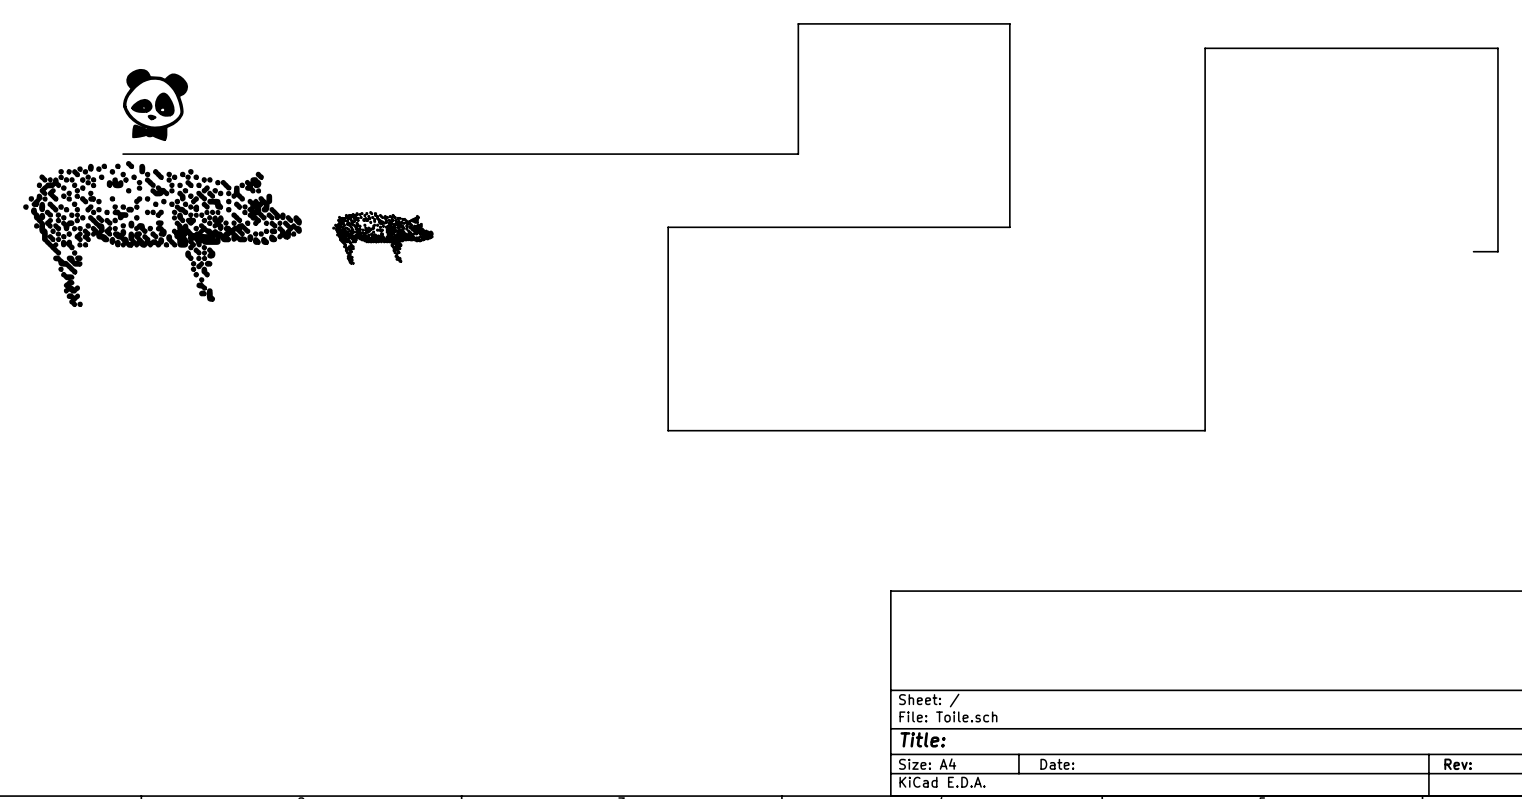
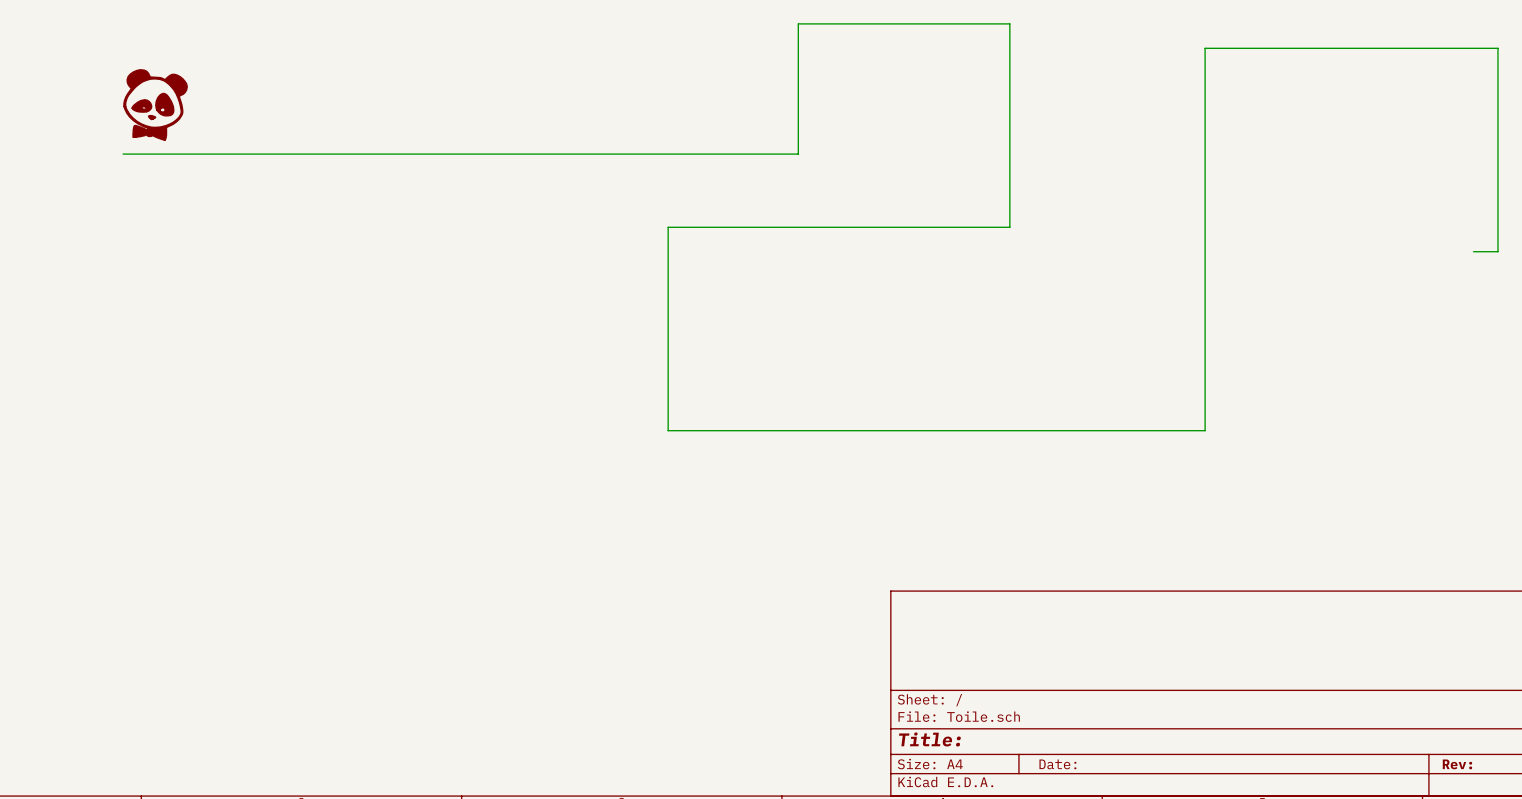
power symbol: (162, 234) -> none
power symbol: (382, 237) -> none

